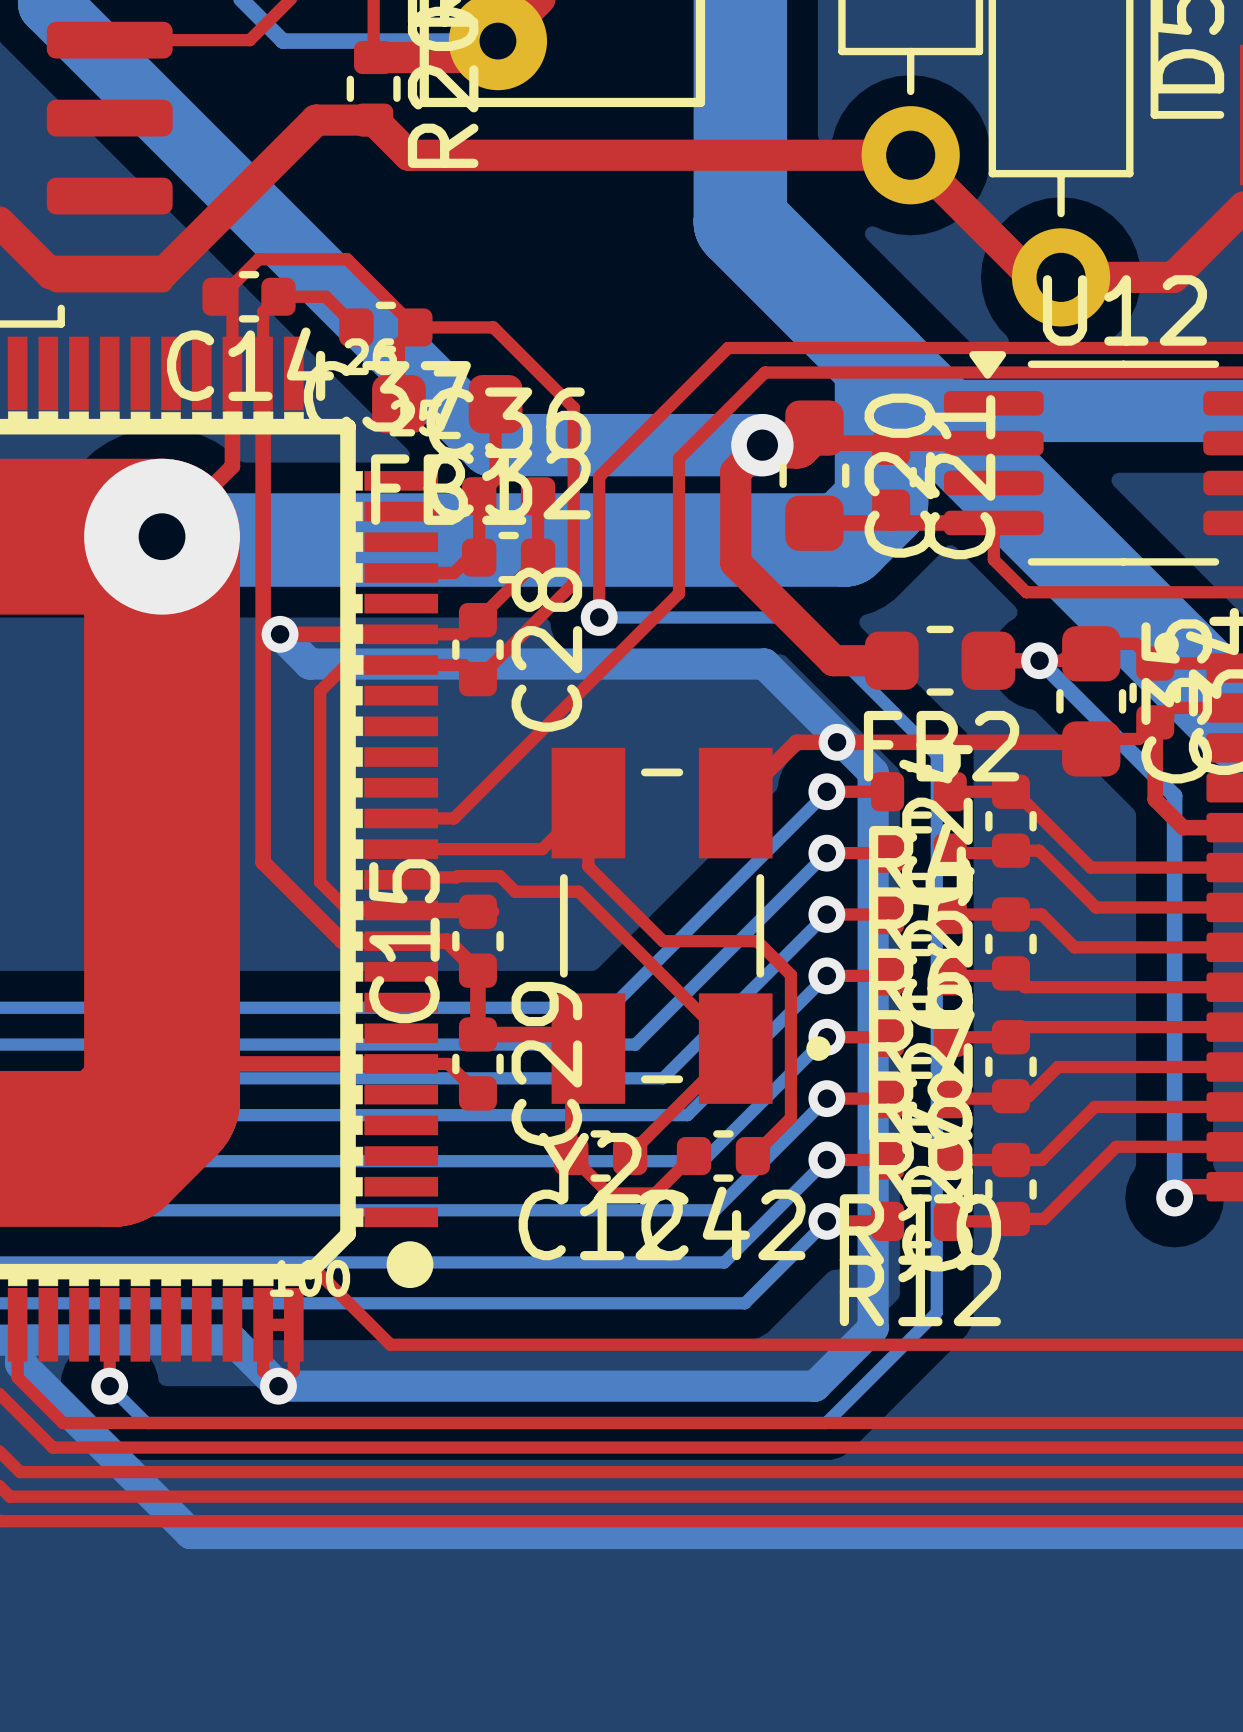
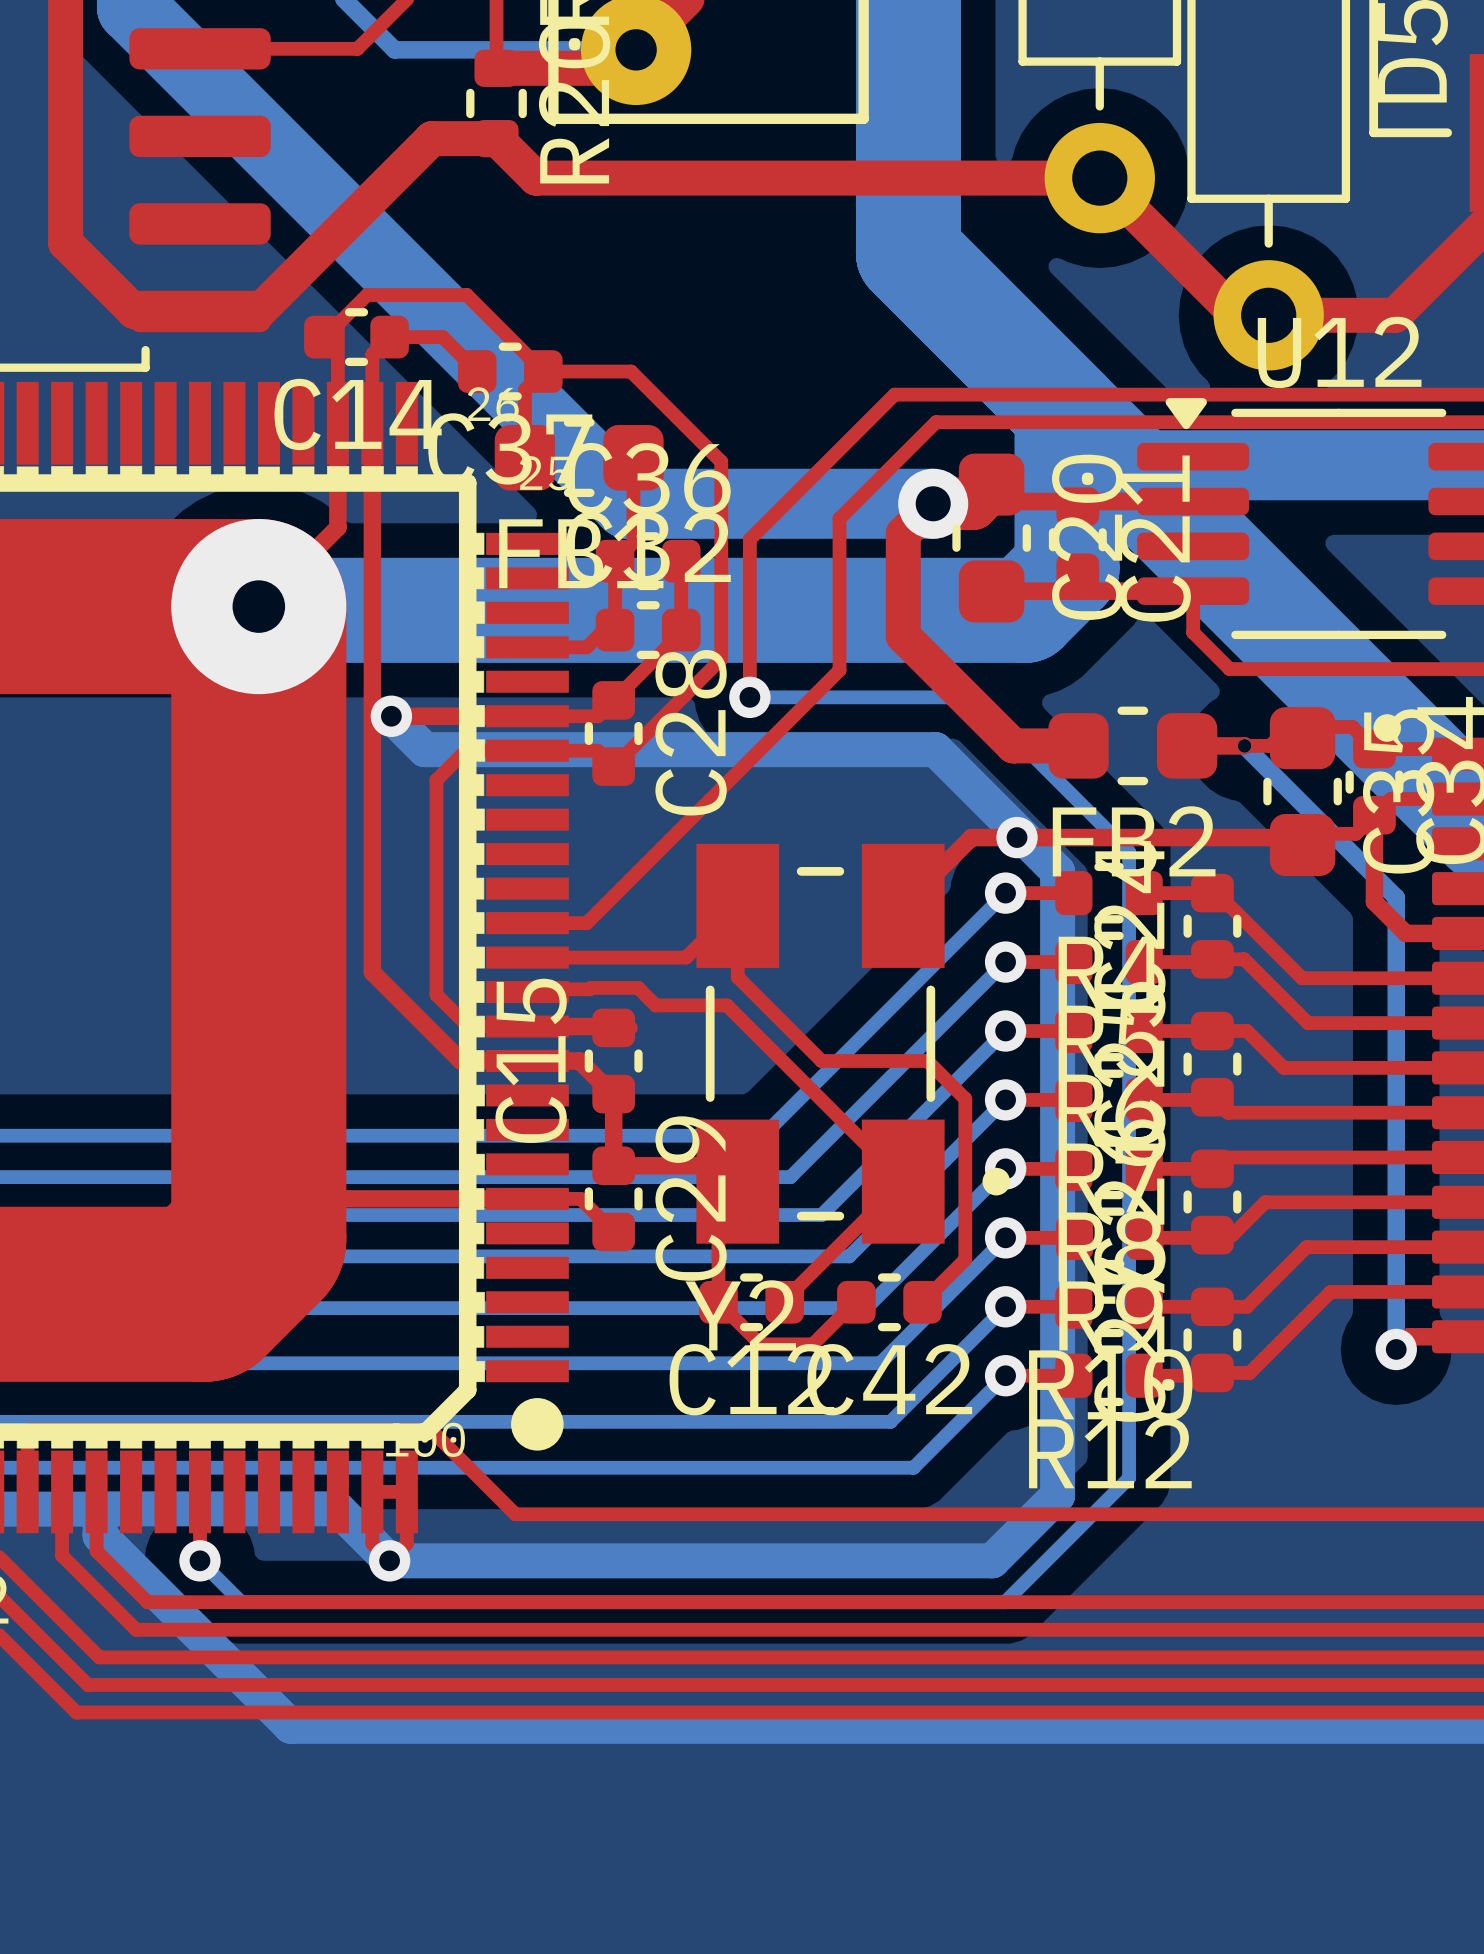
via size: [1021, 642, 1058, 680] -> [1237, 739, 1252, 753]

